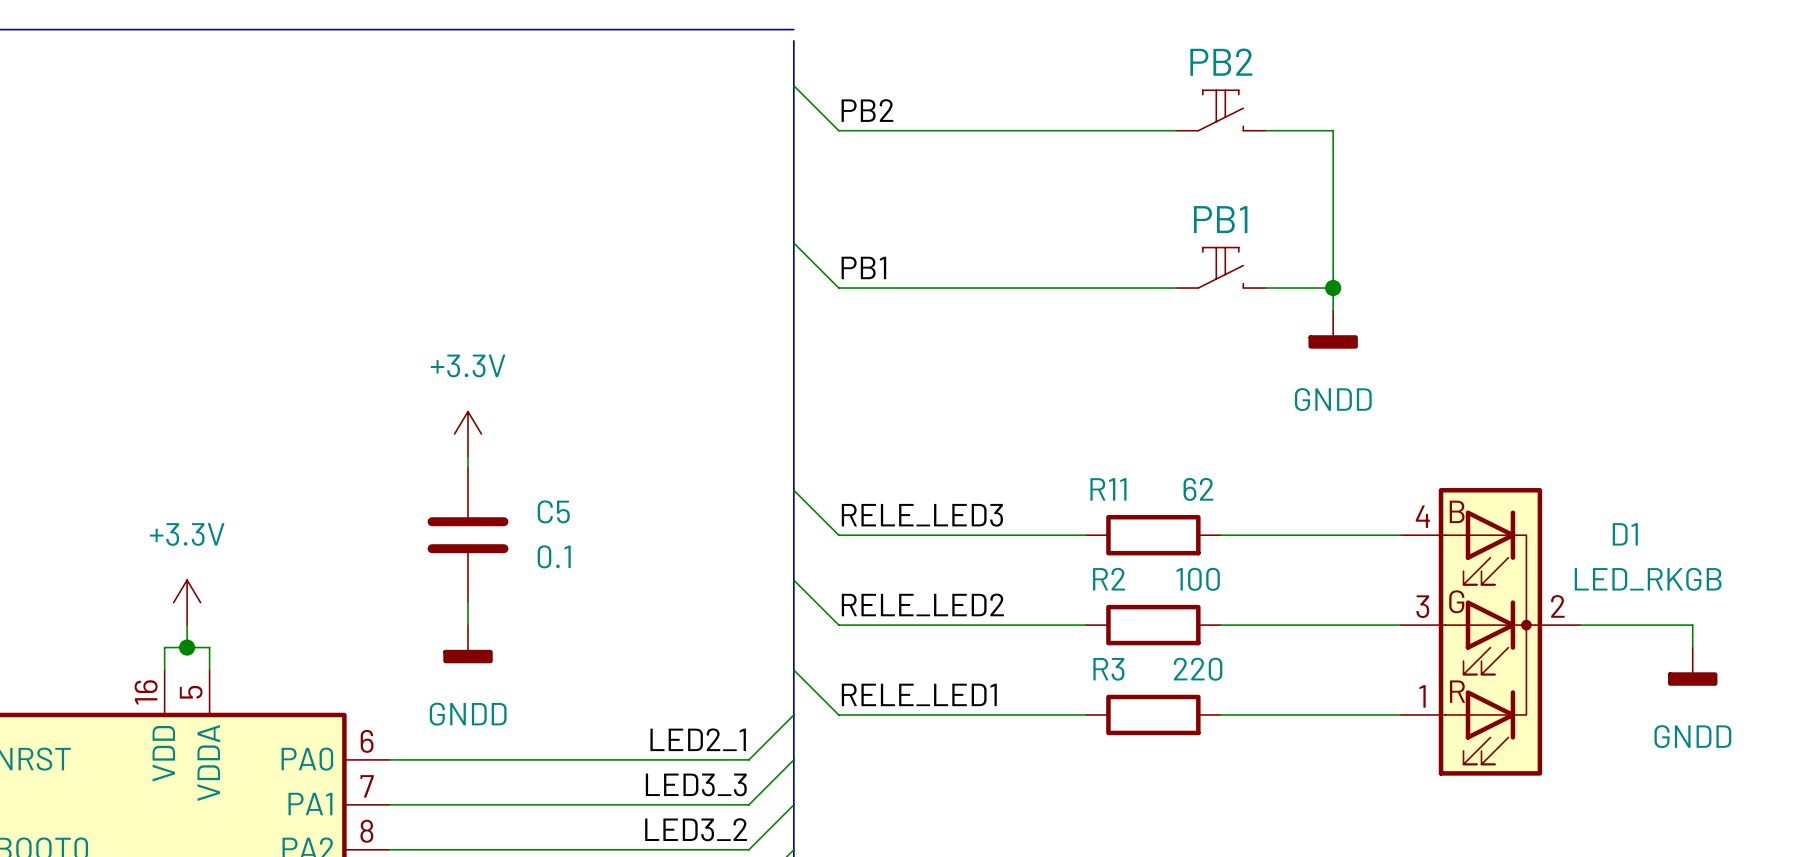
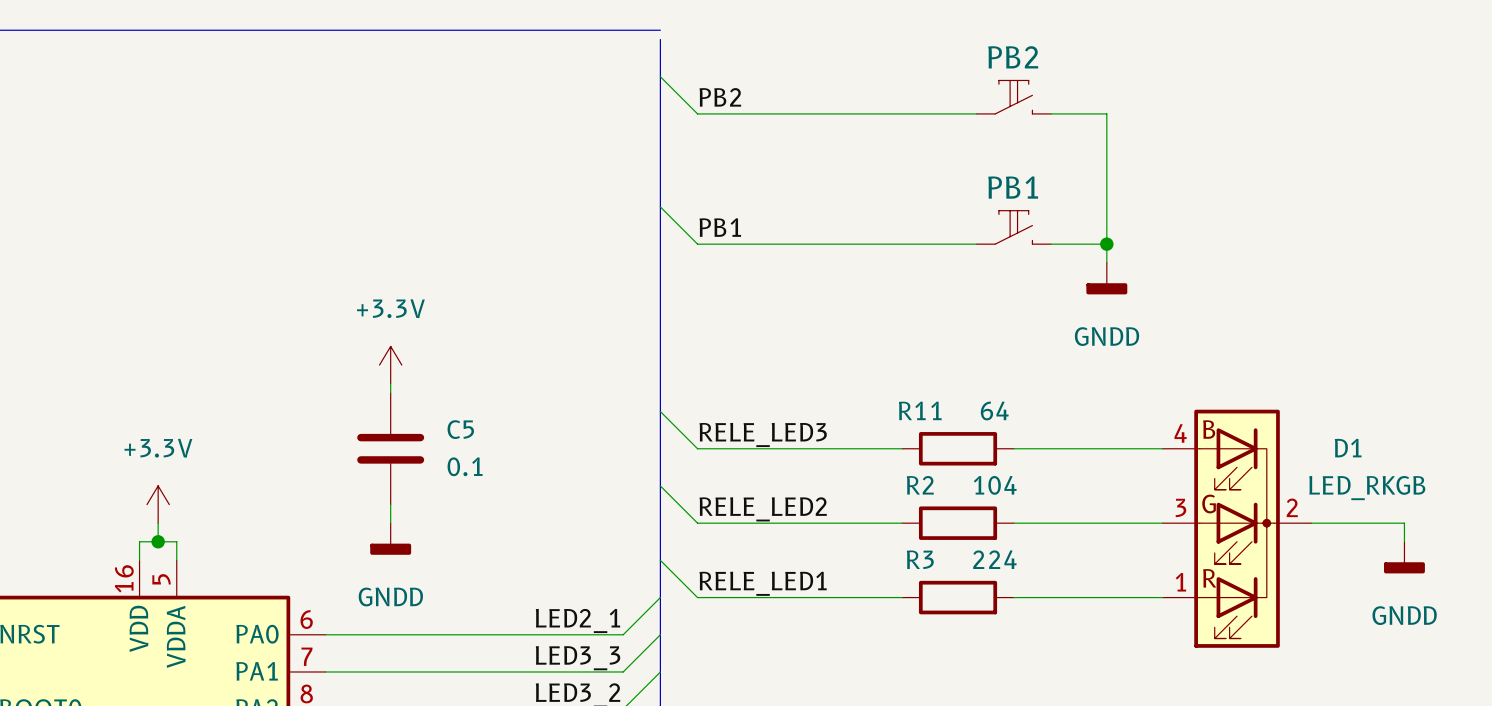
R11 value: 62 (1198, 489) -> 64 (994, 410)
R2 value: 100 (1198, 579) -> 104 (995, 485)
R3 value: 220 (1198, 669) -> 224 (994, 559)

